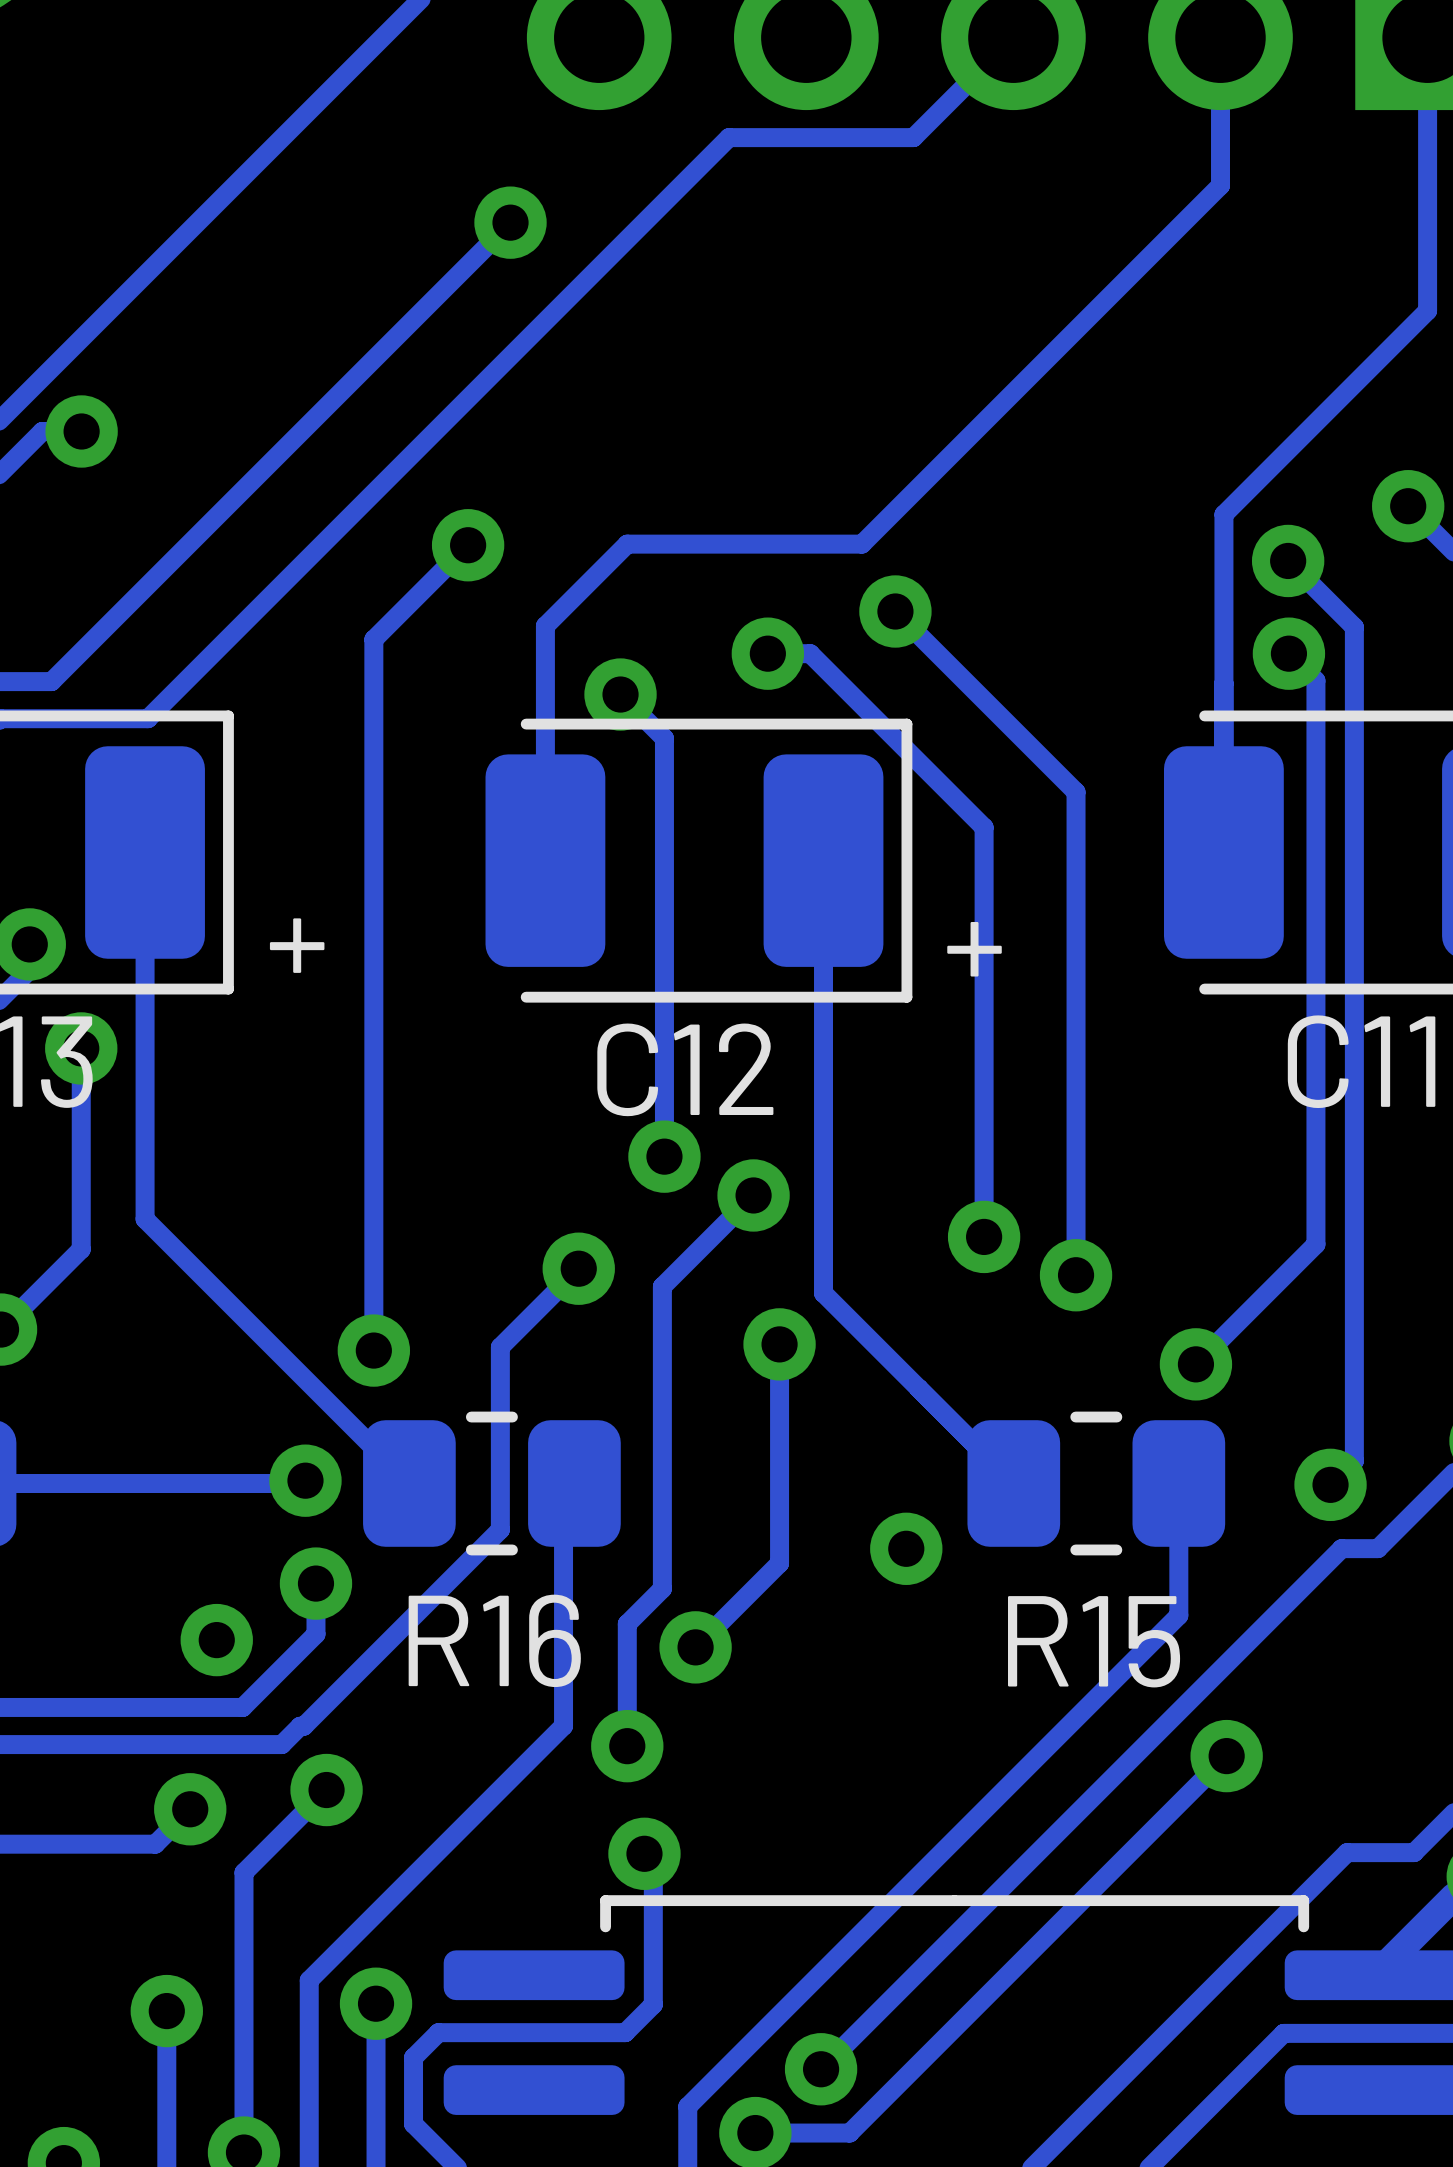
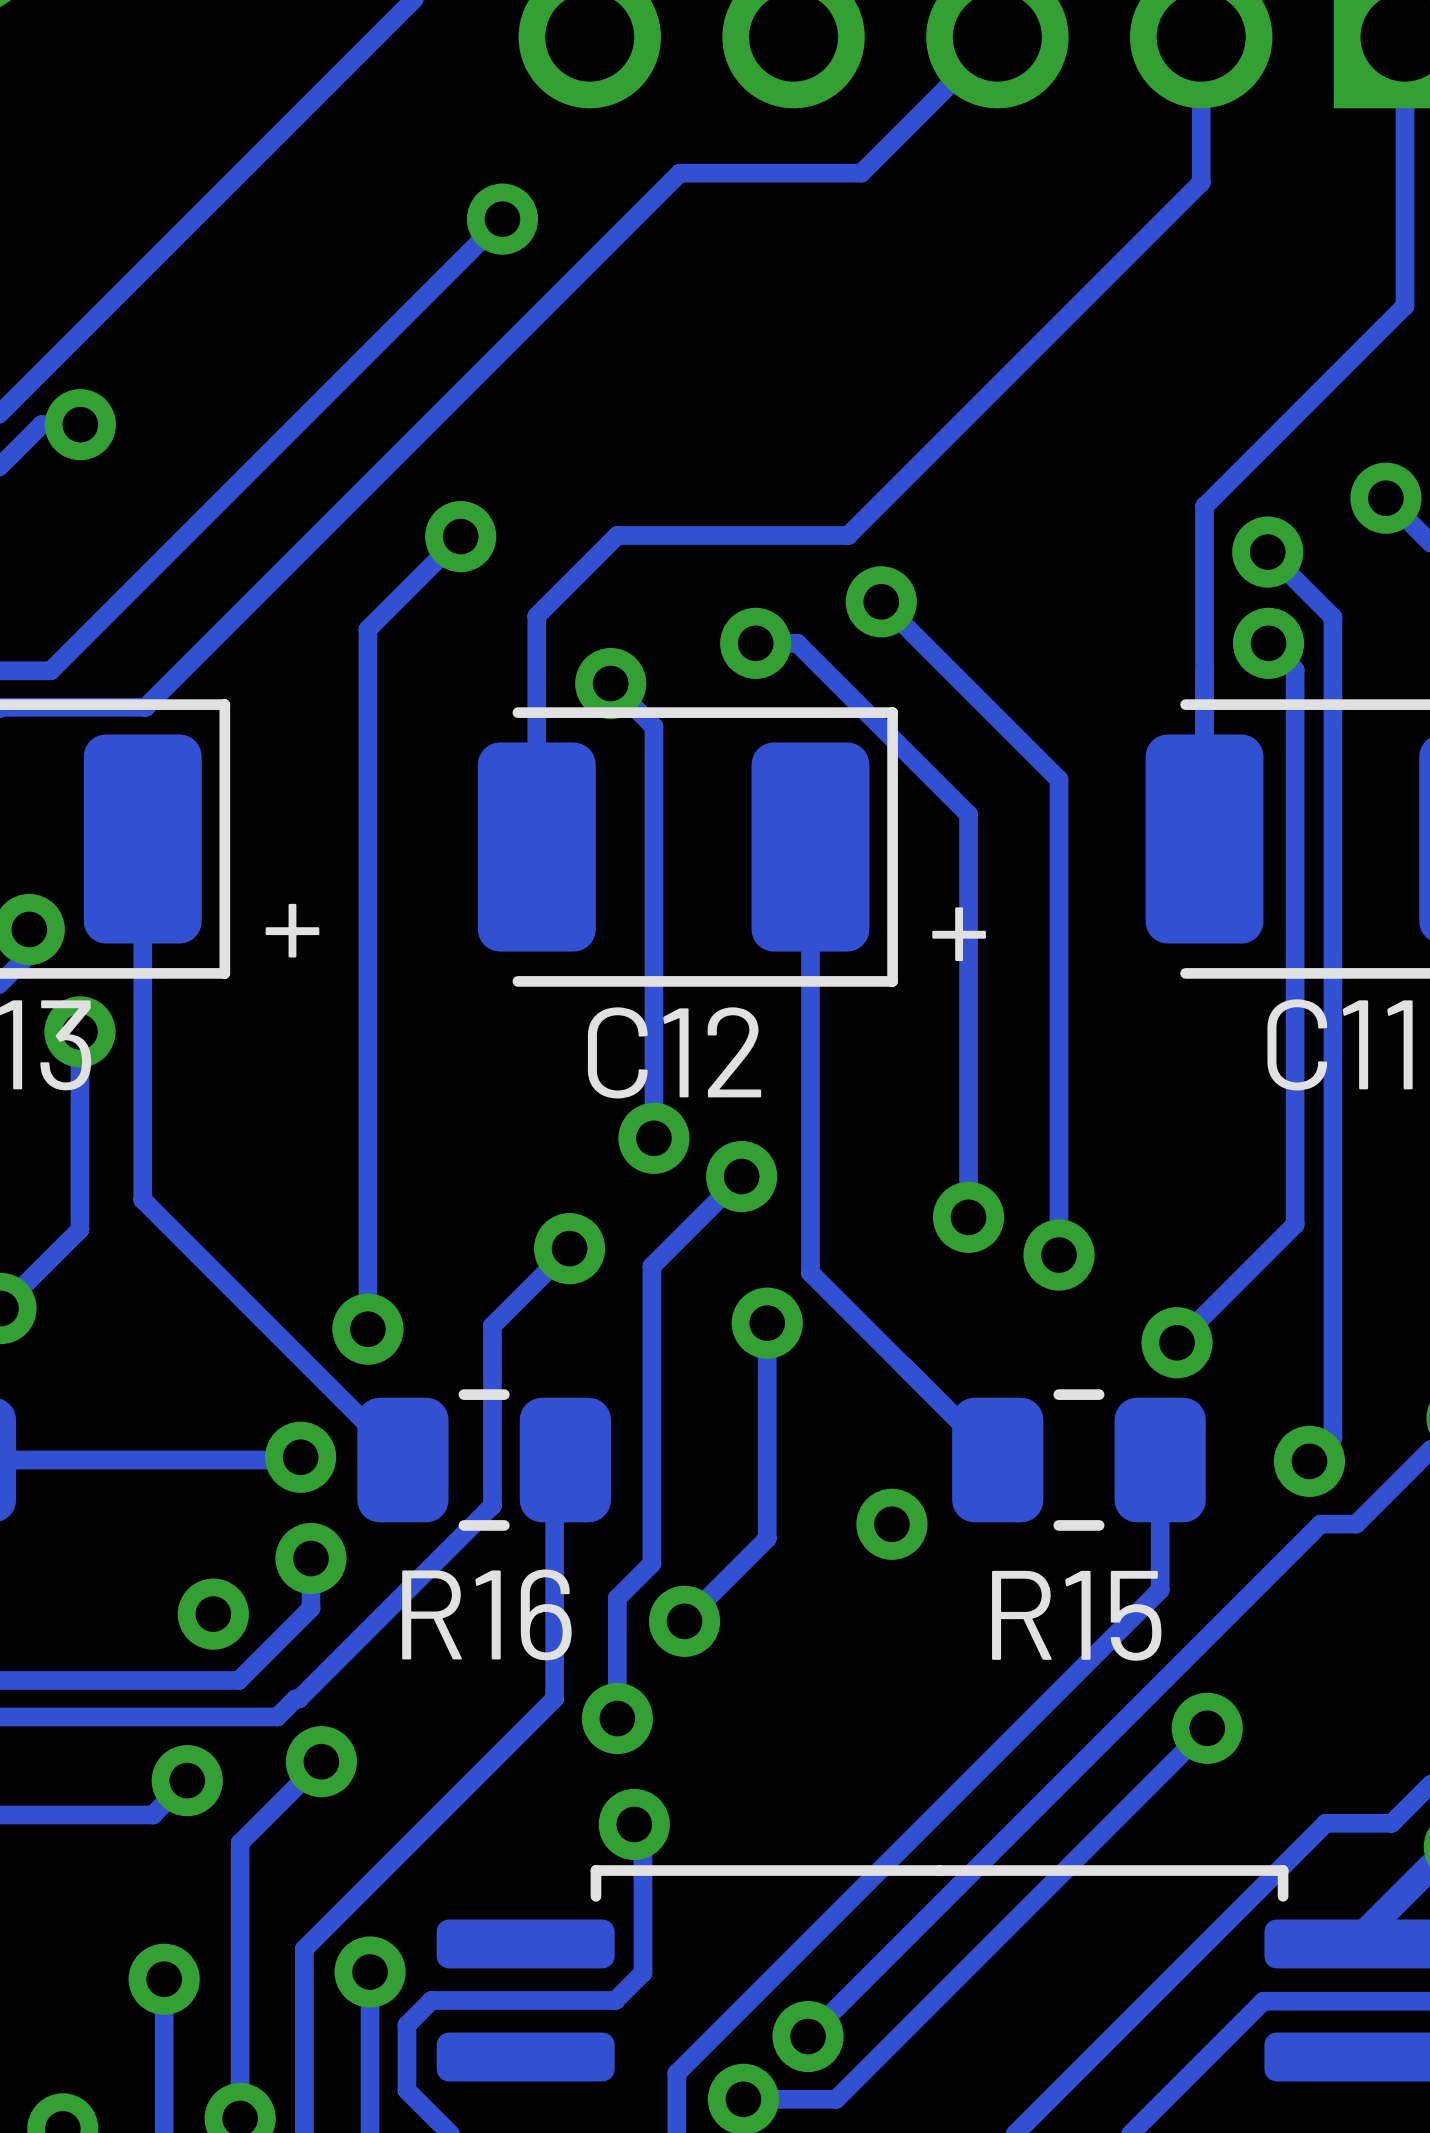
track: (1013, 37) (913, 137) (729, 137) (147, 718) -> (997, 37) (861, 173) (679, 173) (145, 707)

